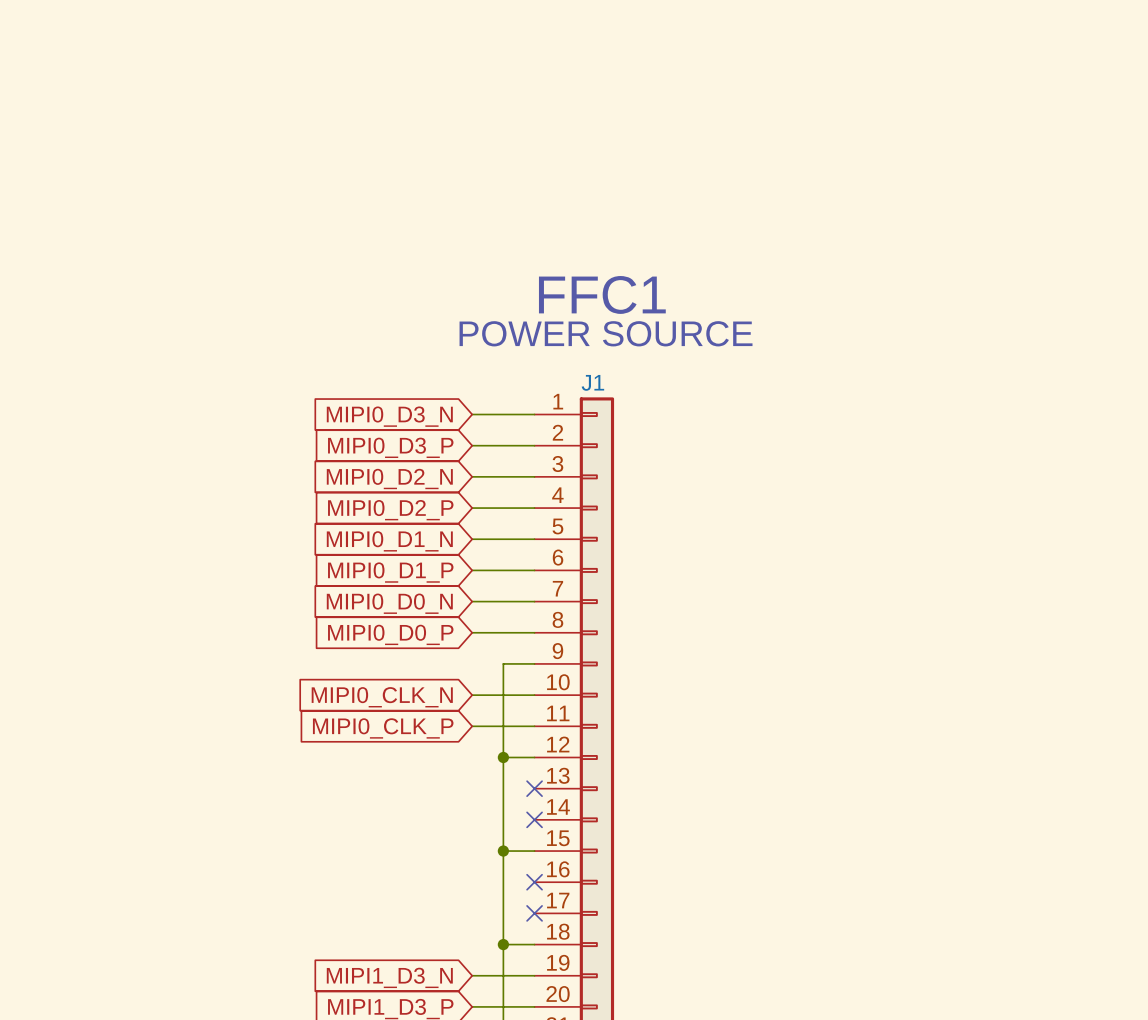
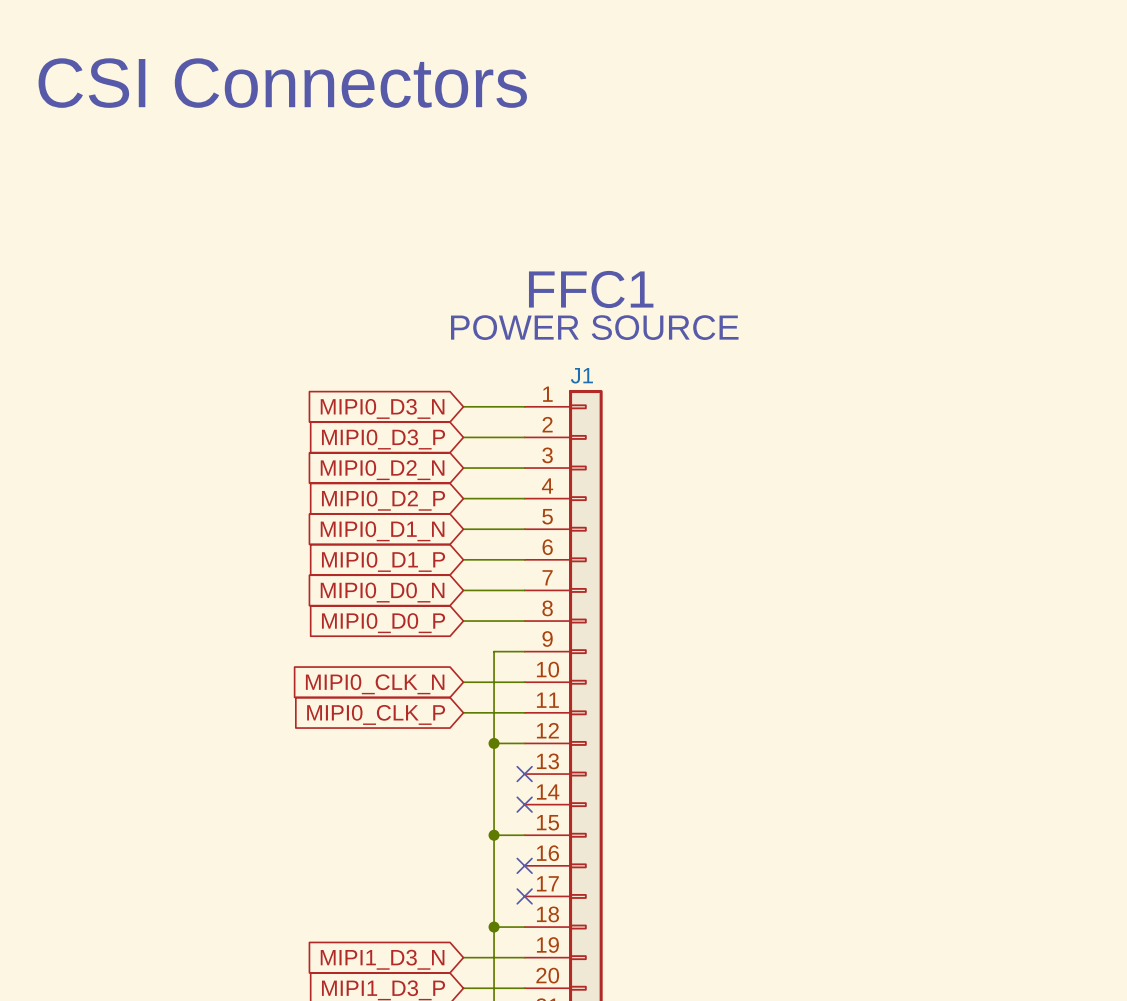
text: none -> CSI Connectors (282, 83)

